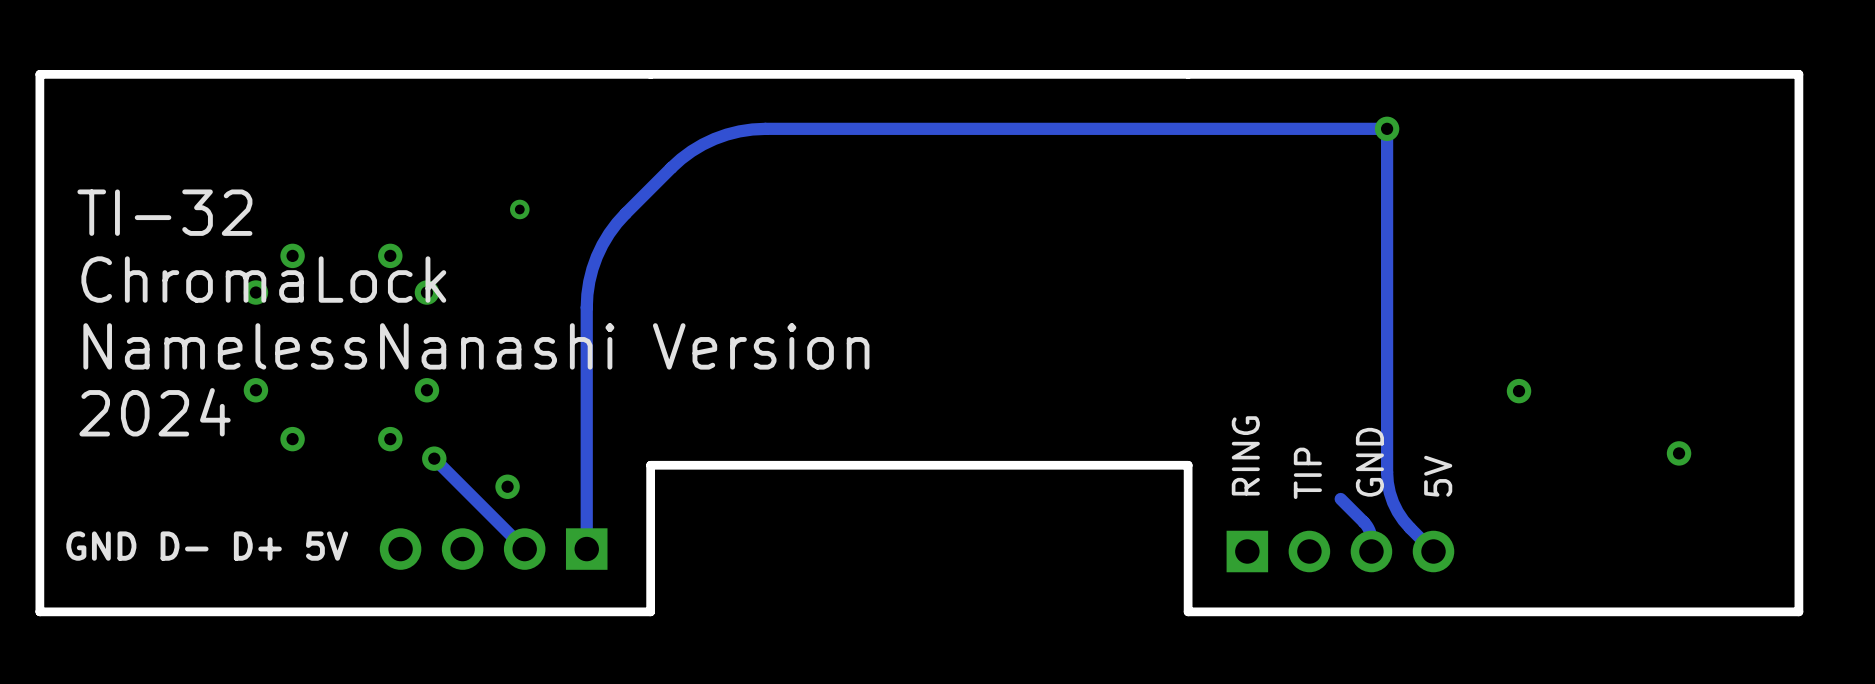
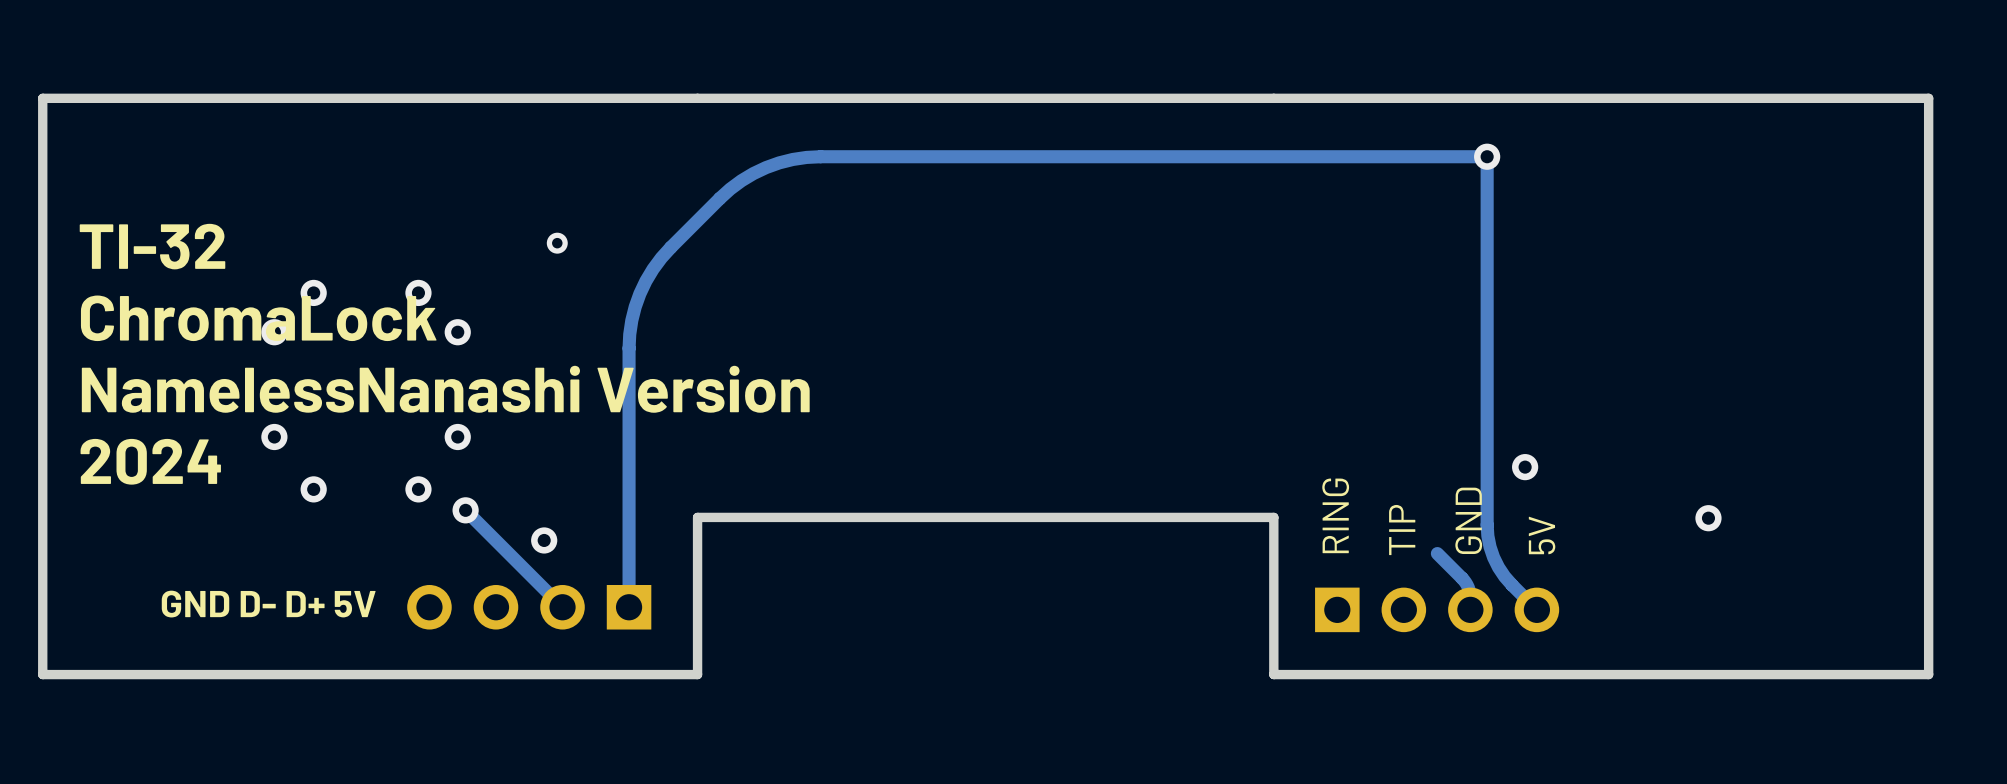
via: (1519, 391) -> none
via: none -> (1525, 467)
via: (1679, 453) -> none
via: none -> (1708, 518)

